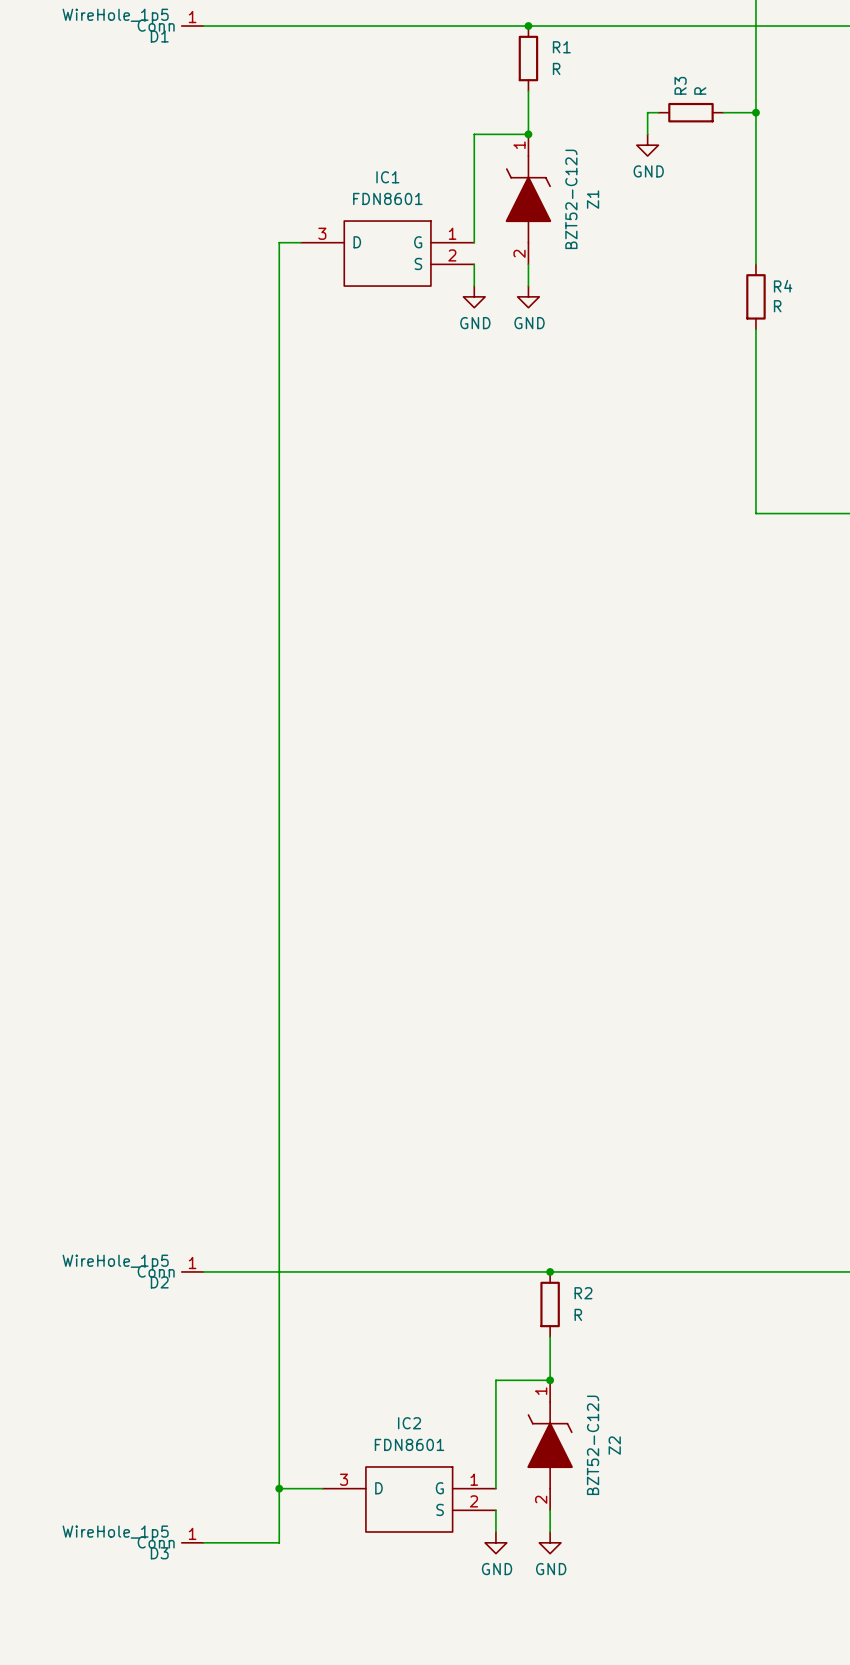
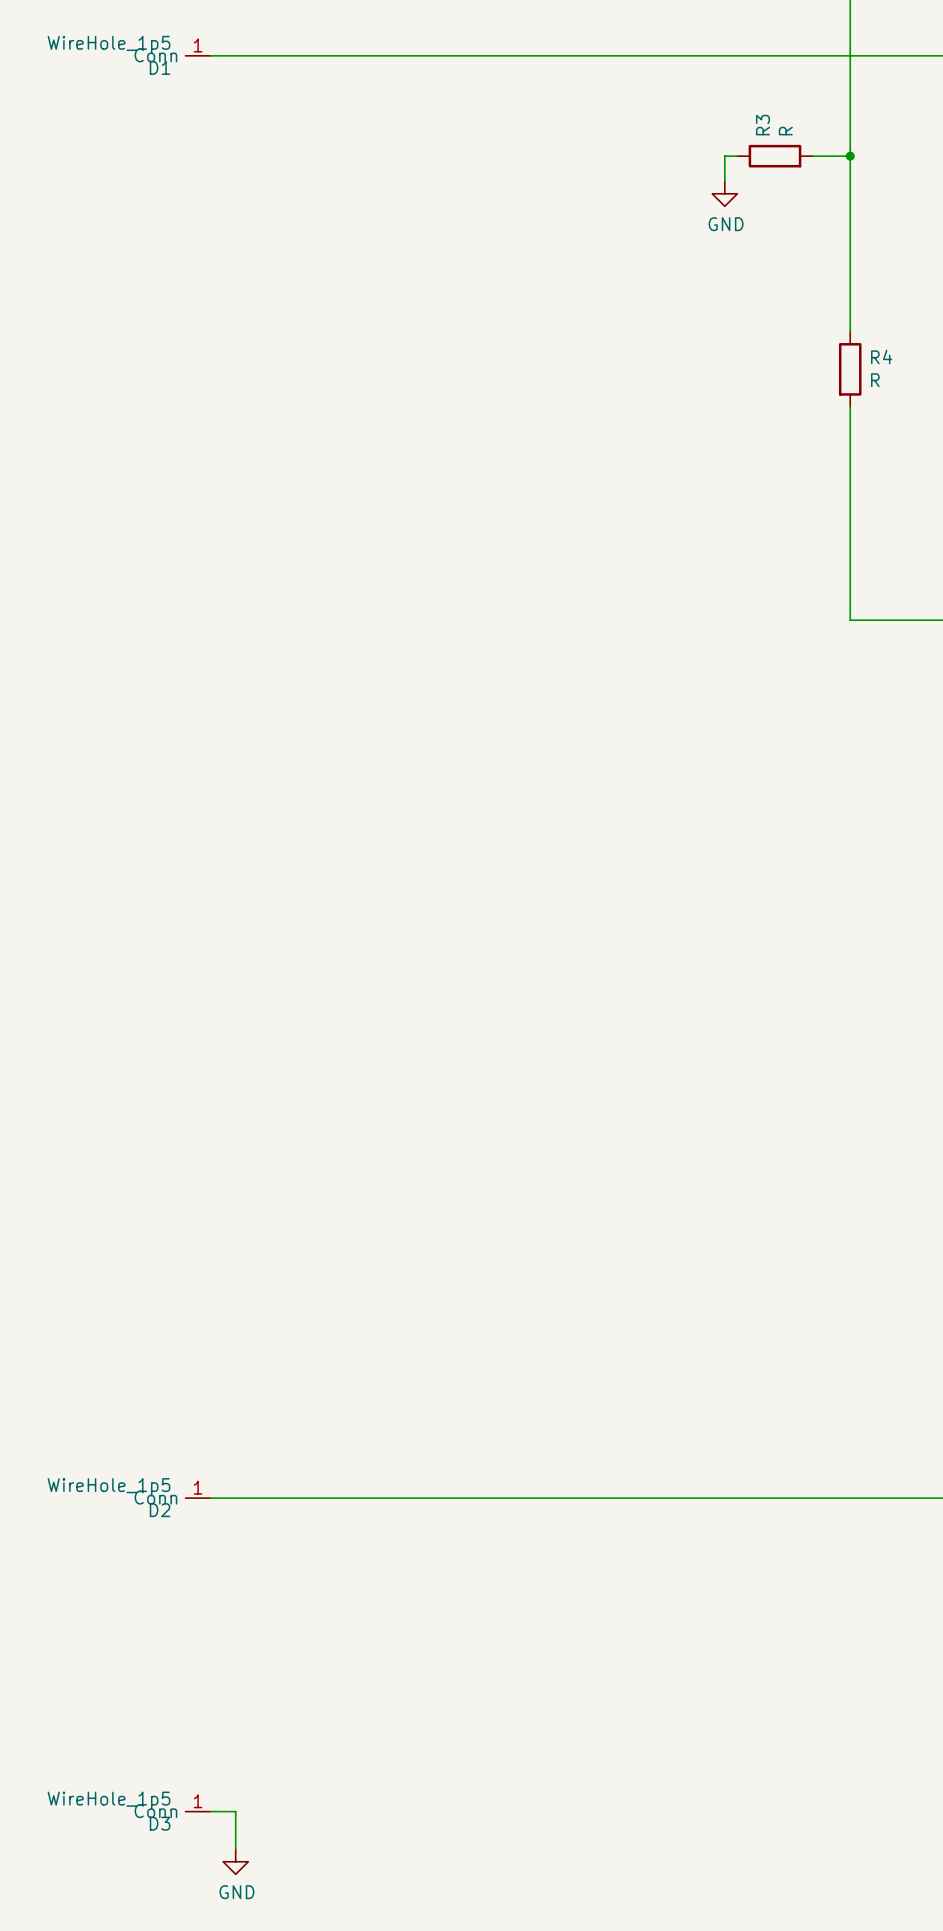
junction: (528, 26) -> none
R1: R (528, 58) -> none
wire: (528, 91) (528, 134) (474, 134) (474, 242) -> none
junction: (528, 134) -> none
Z1: BZT52-C12J (528, 199) -> none
wire: (300, 242) (279, 242) (279, 1542) (225, 1542) -> (235, 1849) (235, 1811)
IC1: FDN8601 (387, 253) -> none
wire: (474, 264) (474, 286) -> none
wire: (528, 264) (528, 286) -> none
power symbol: GND (474, 296) -> none
power symbol: GND (528, 296) -> none
junction: (550, 1271) -> none
R2: R (550, 1304) -> none
wire: (550, 1336) (550, 1380) (495, 1380) (495, 1488) -> none
junction: (550, 1380) -> none
Z2: BZT52-C12J (550, 1445) -> none
wire: (279, 1488) (322, 1488) -> none
junction: (279, 1488) -> none
IC2: FDN8601 (409, 1499) -> none
wire: (495, 1510) (495, 1531) -> none
wire: (550, 1510) (550, 1531) -> none
power symbol: GND (495, 1542) -> none
power symbol: GND (550, 1542) -> none
power symbol: none -> GND (235, 1861)

